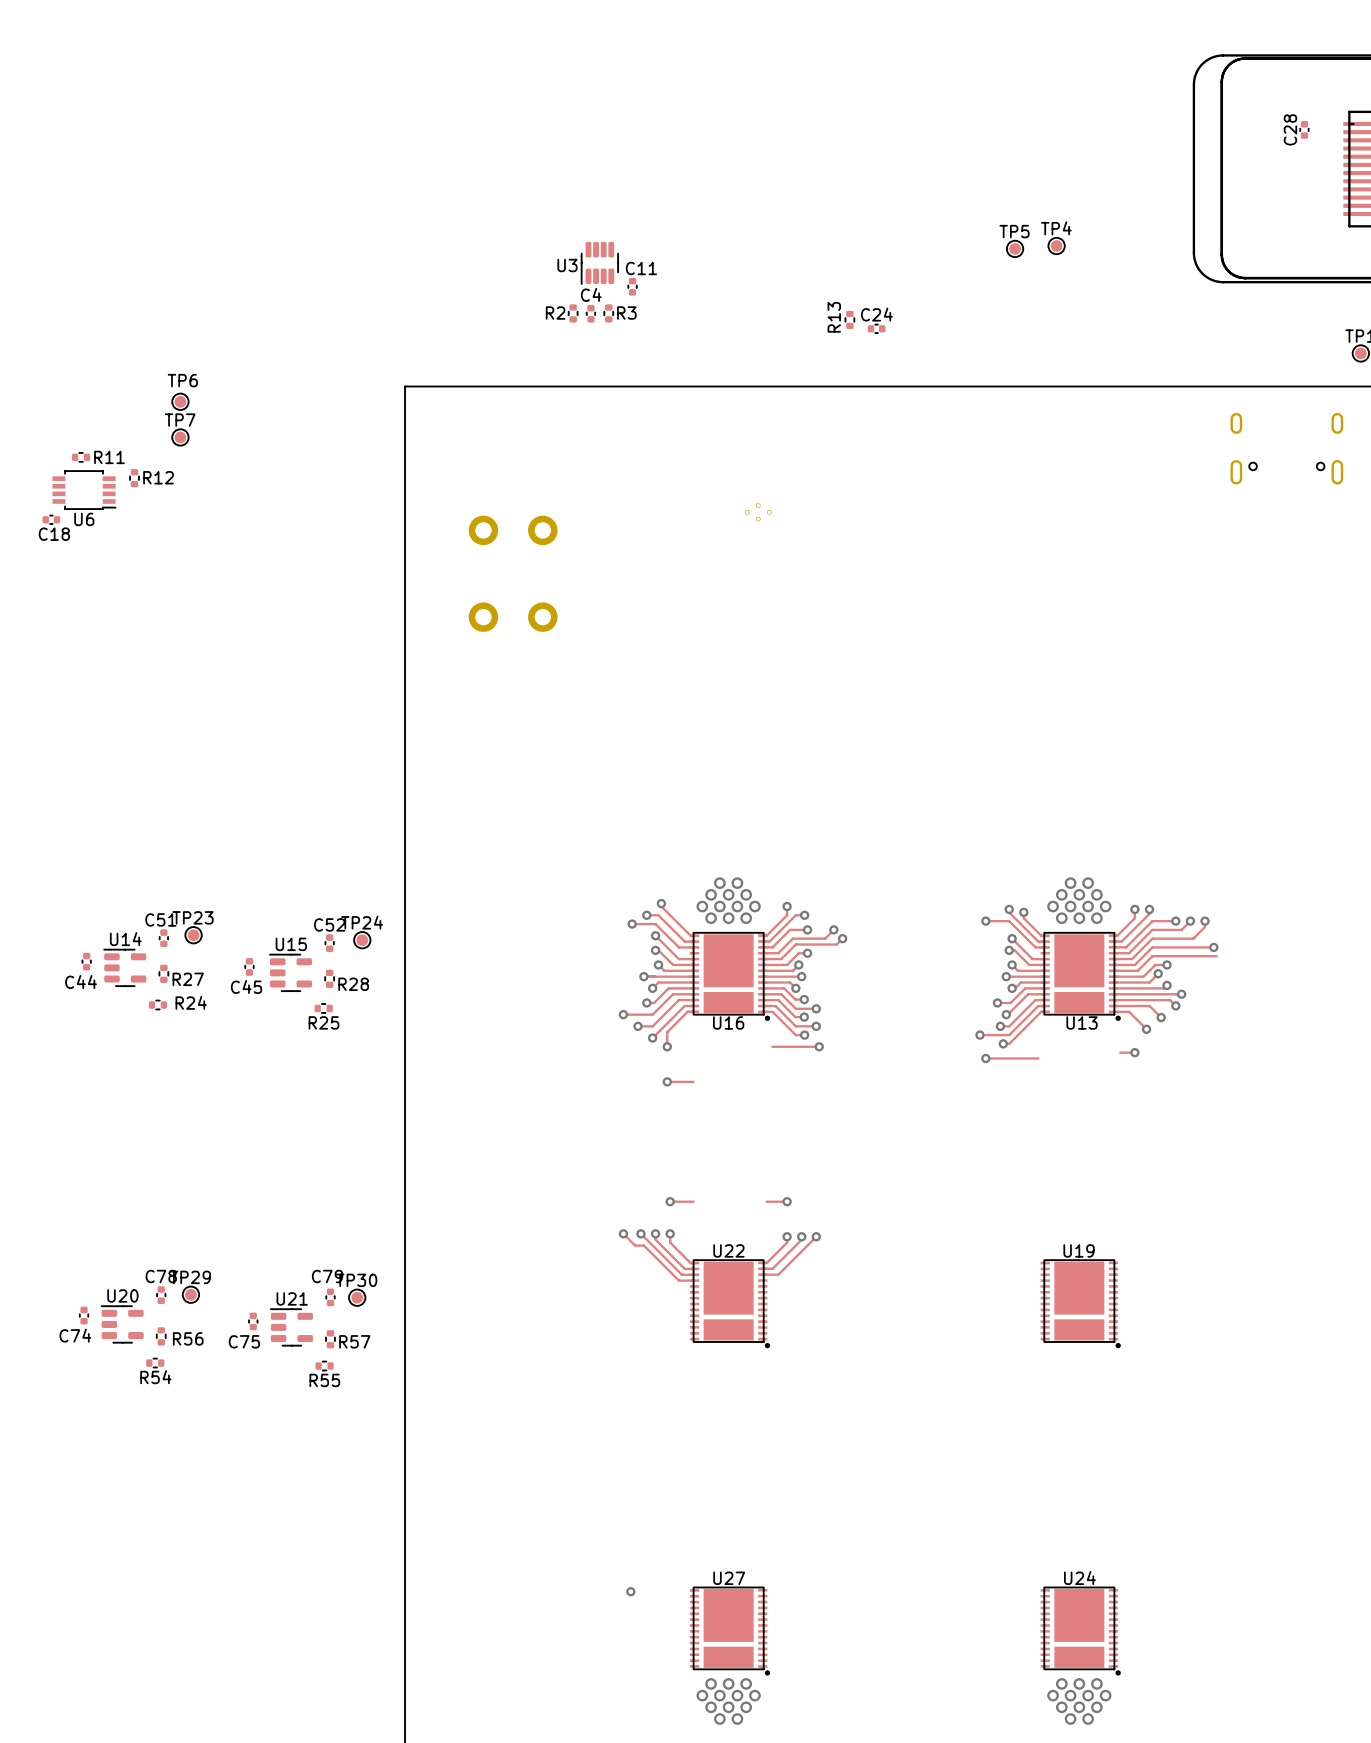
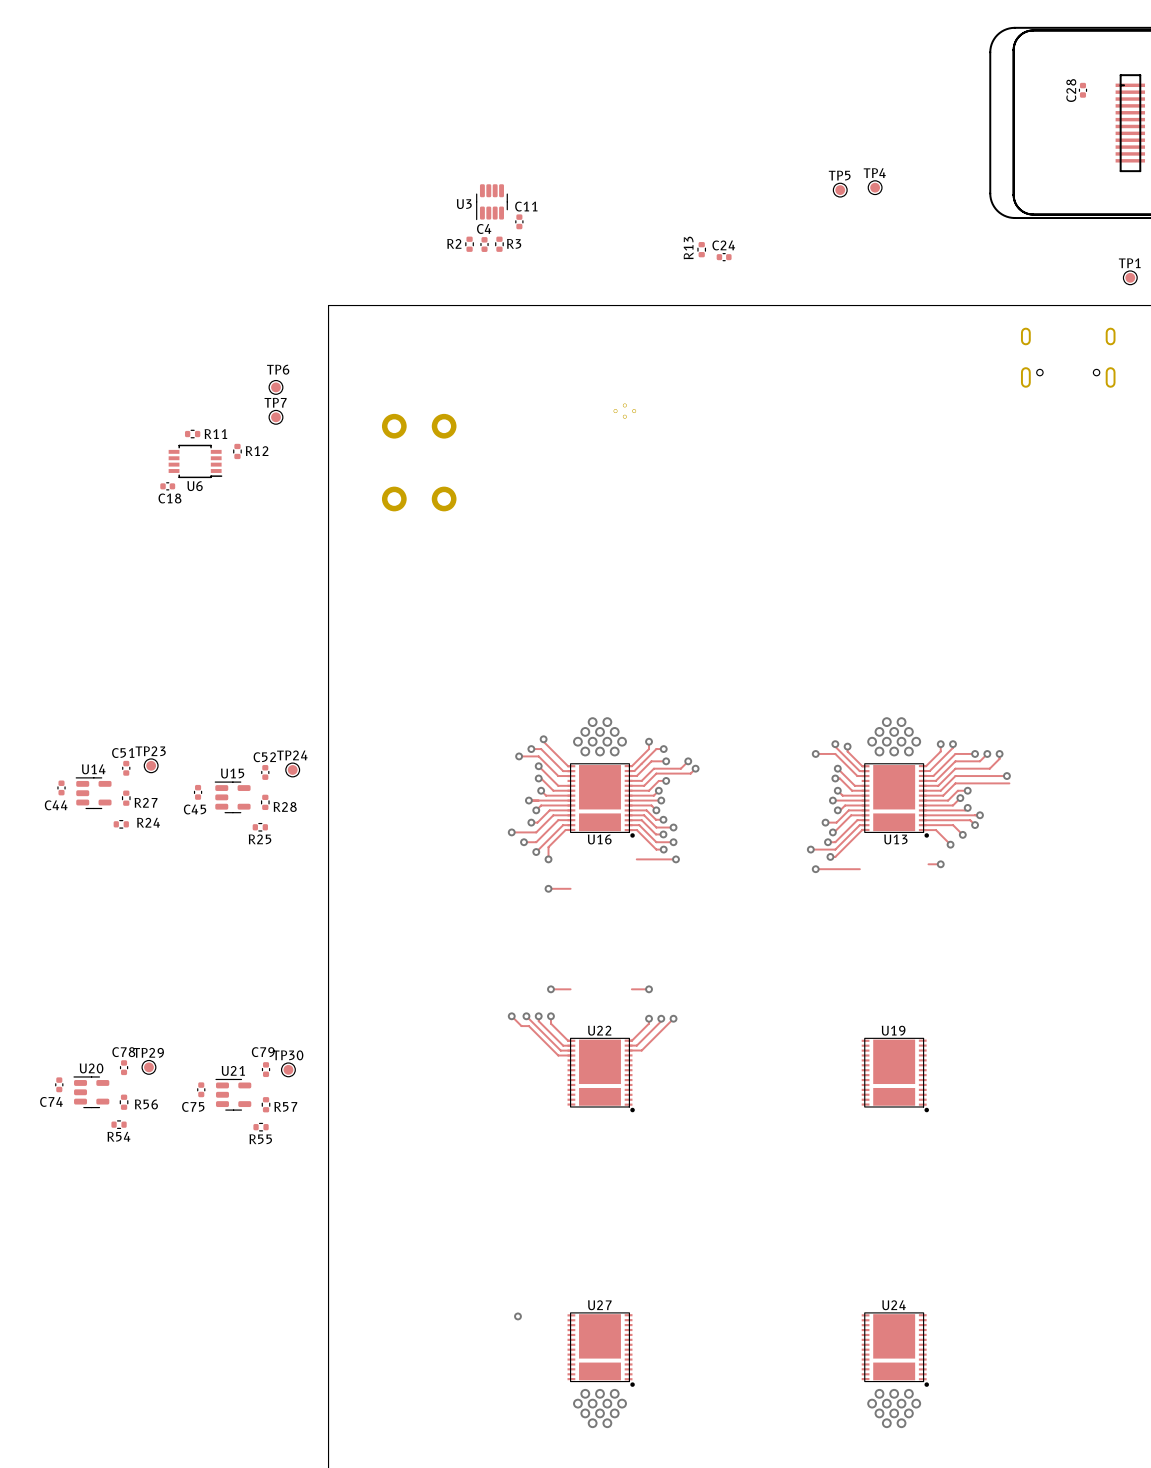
TP6 position: (180, 401) -> (275, 387)
TP7 position: (180, 437) -> (275, 417)
R11 position: (81, 457) -> (192, 434)
R12 position: (134, 478) -> (237, 451)
U6 position: (84, 490) -> (195, 461)
C18 position: (51, 519) -> (167, 486)

